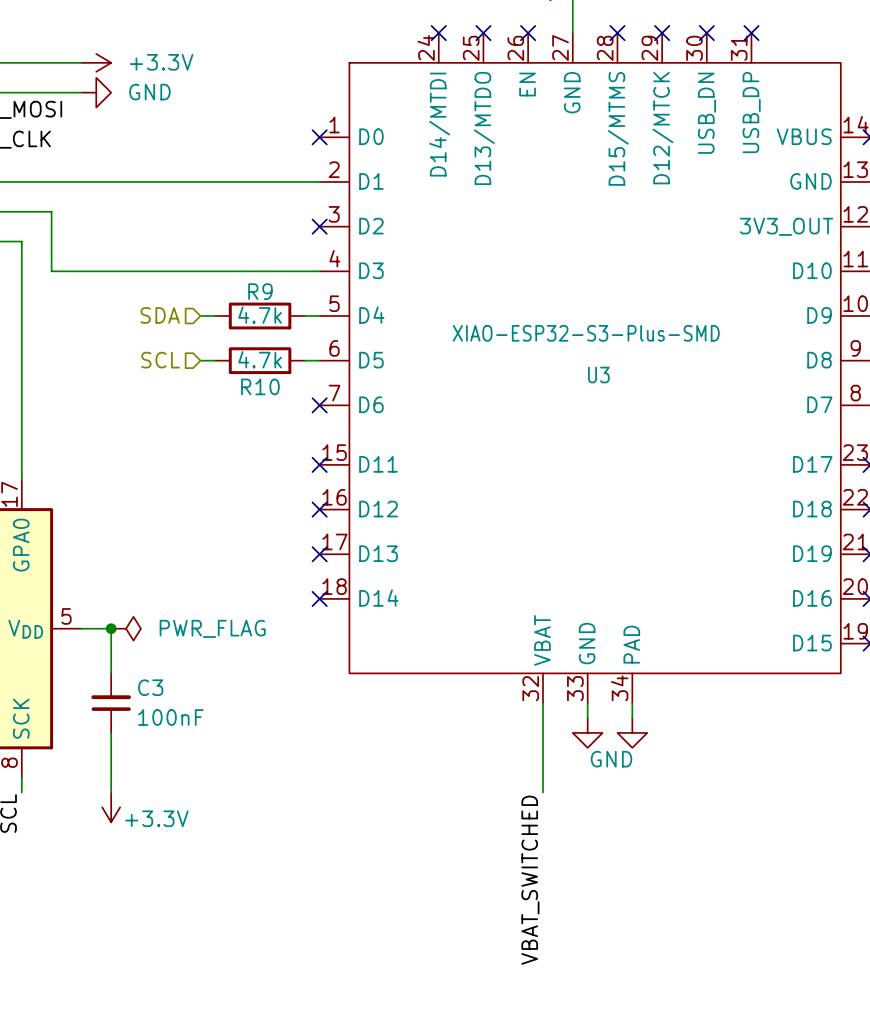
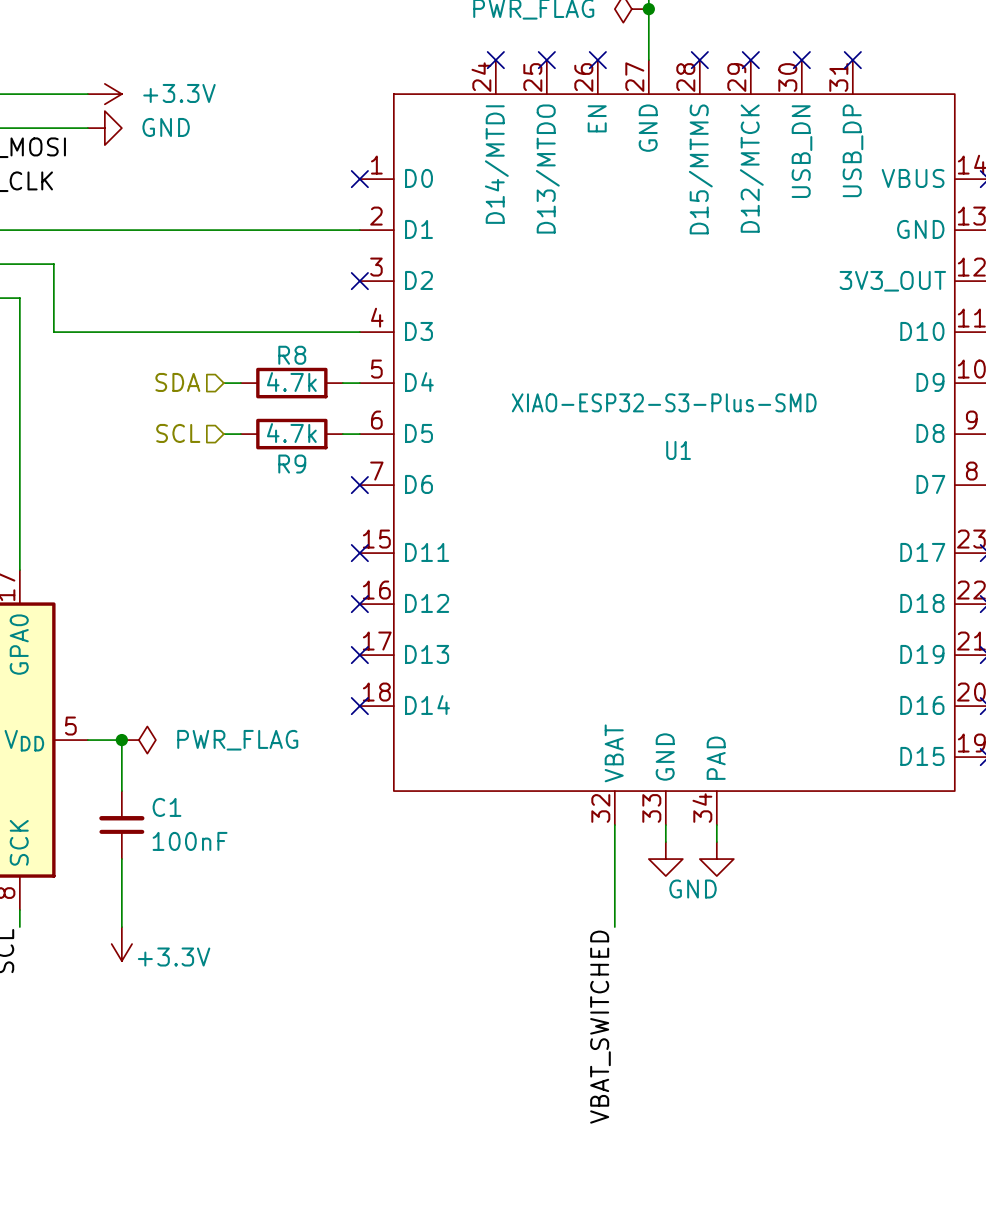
R9 name: R9 (260, 291) -> R8 (292, 355)
U3 name: U3 (598, 375) -> U1 (678, 450)
R10 name: R10 (260, 386) -> R9 (292, 464)
C3 name: C3 (150, 687) -> C1 (167, 807)

